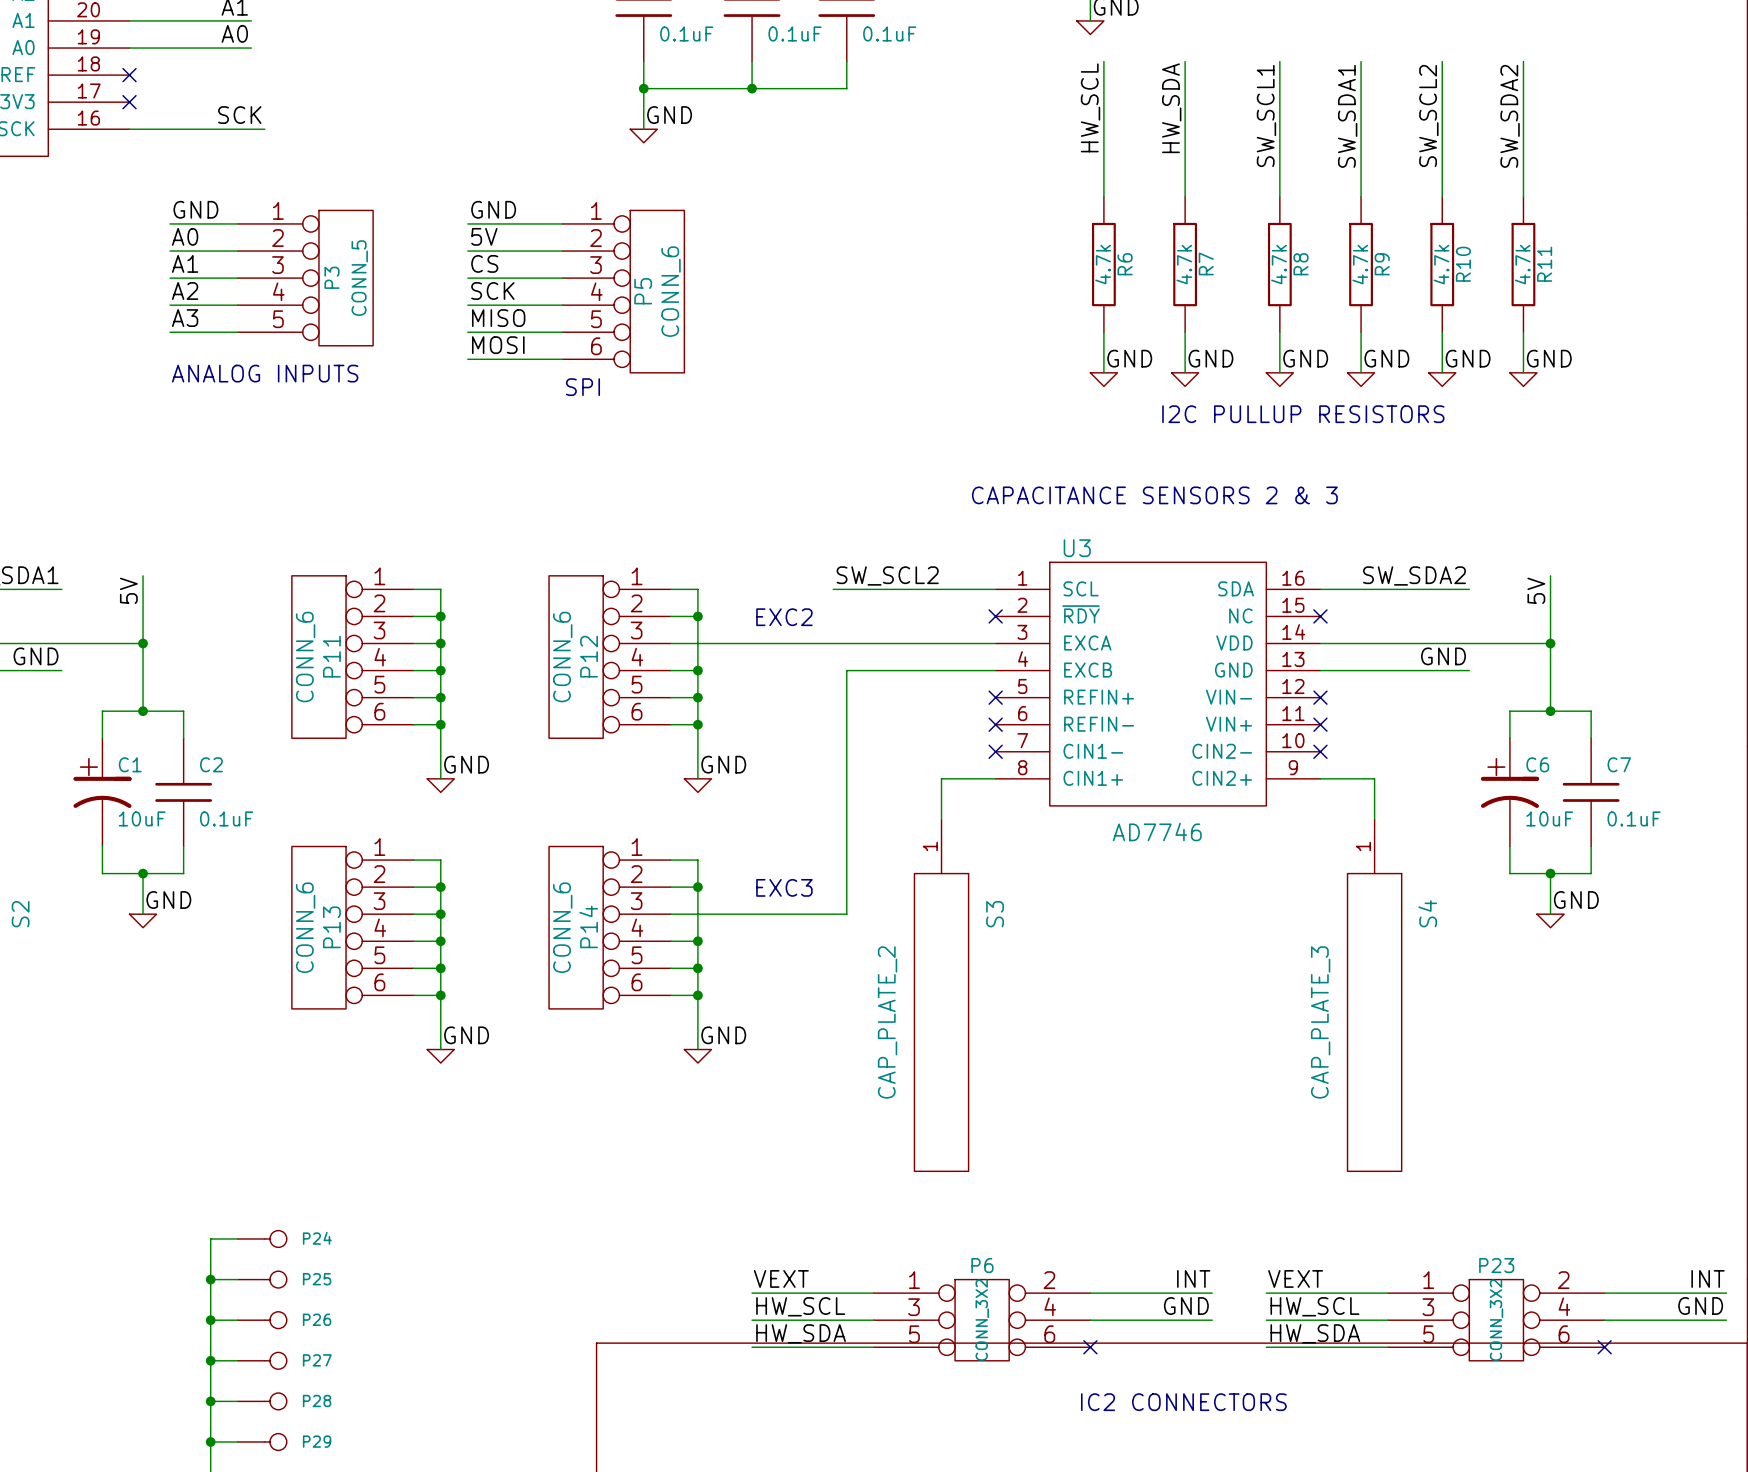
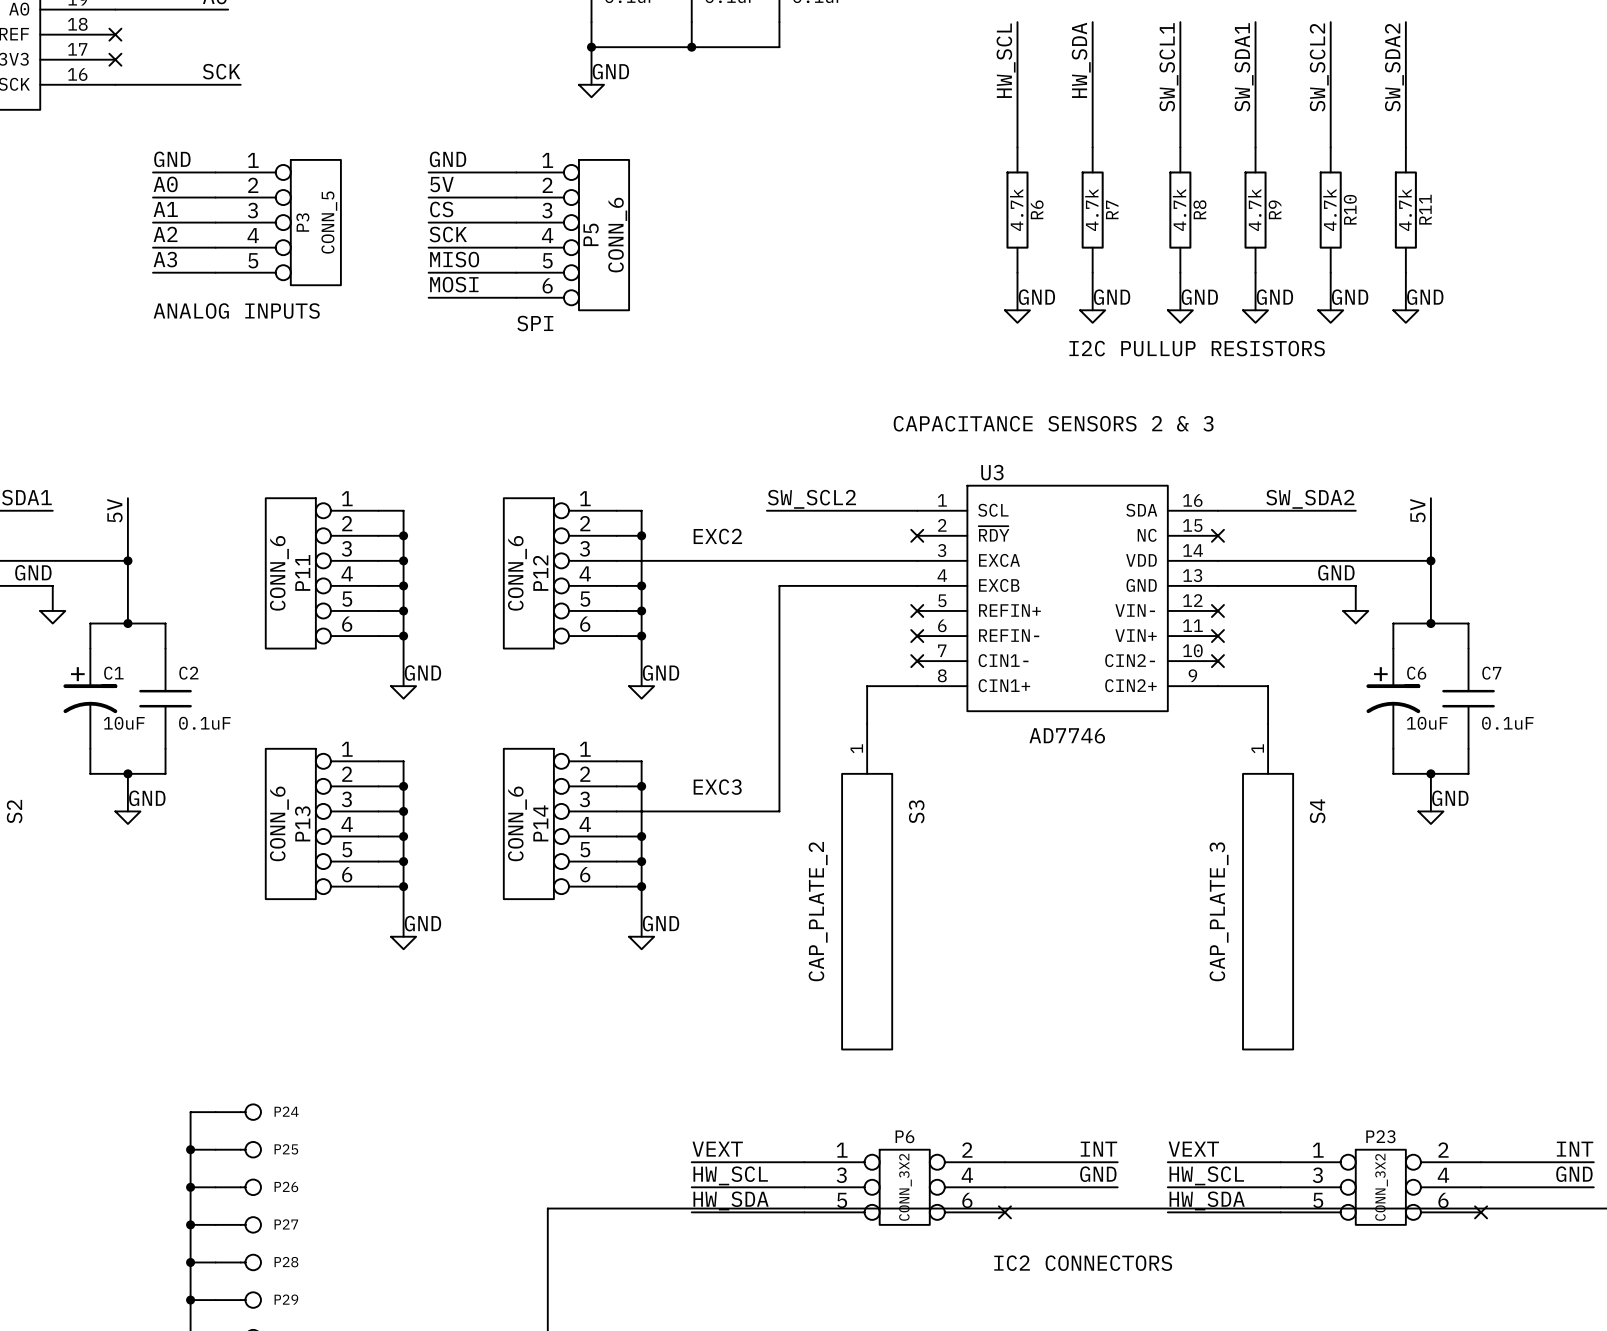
wire: none -> (52, 585) (52, 610)
wire: none -> (1355, 585) (1355, 610)
power symbol: none -> (52, 617)
power symbol: none -> (1355, 617)

